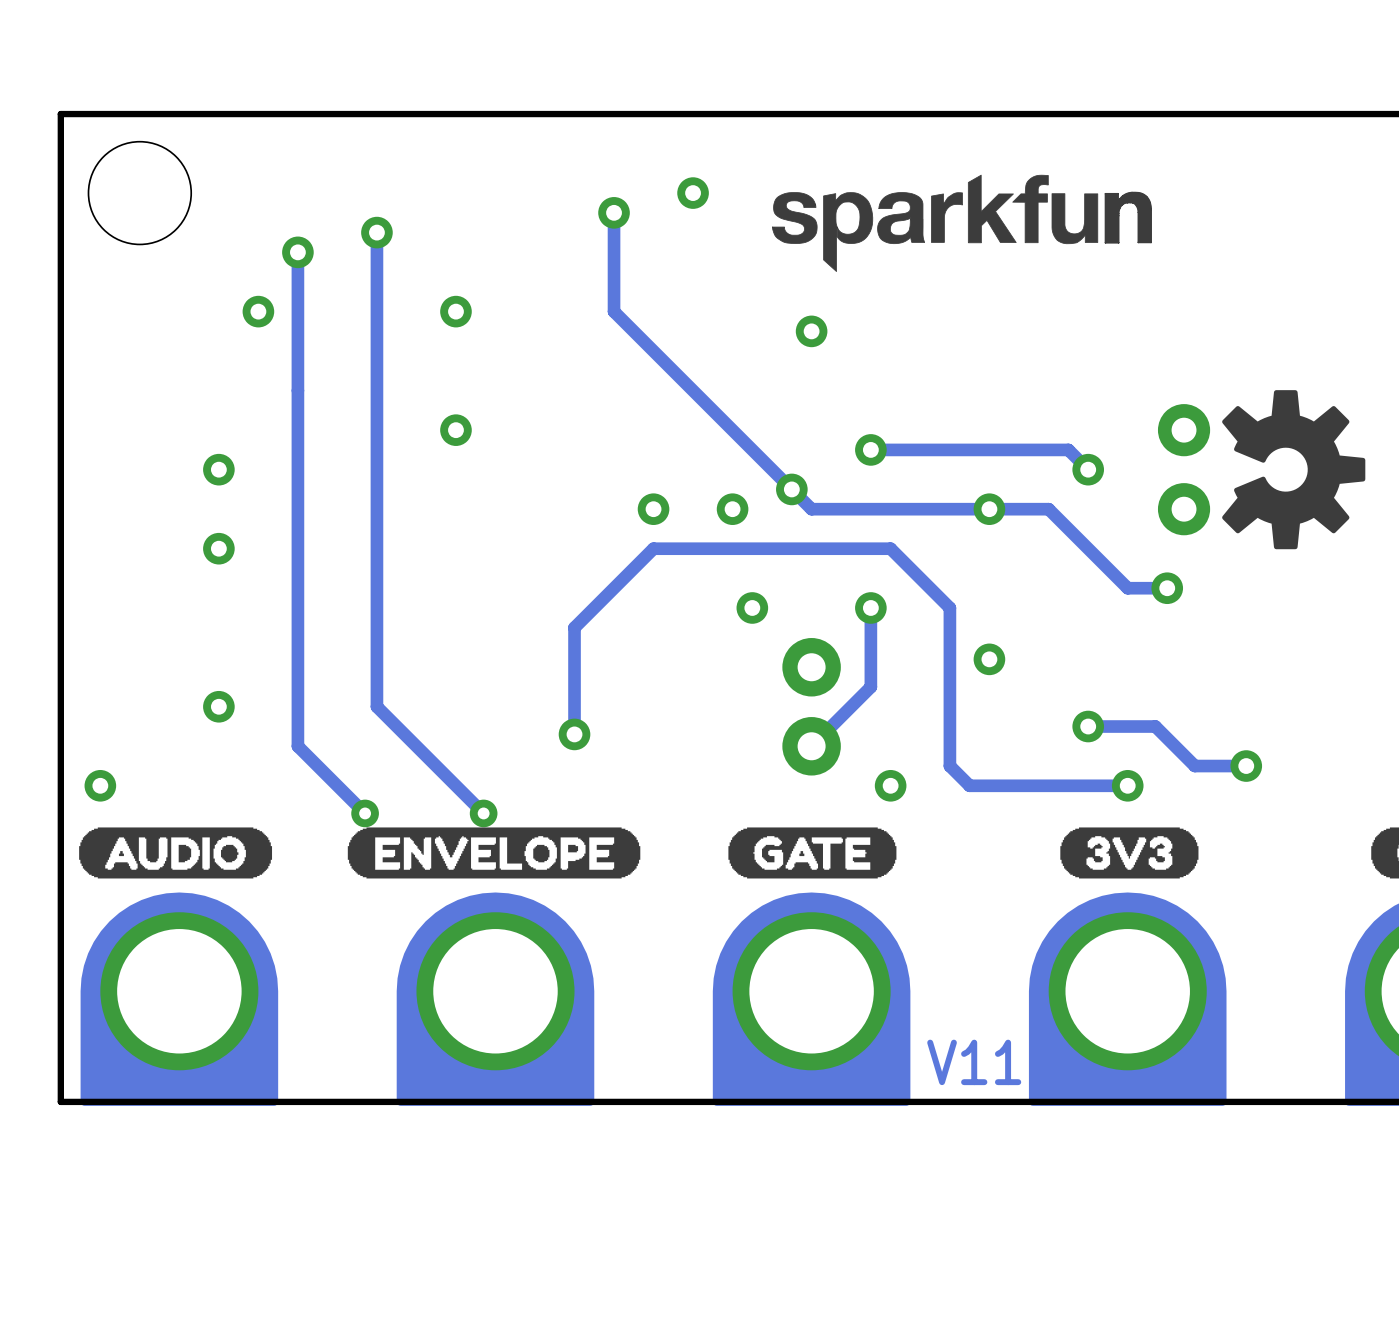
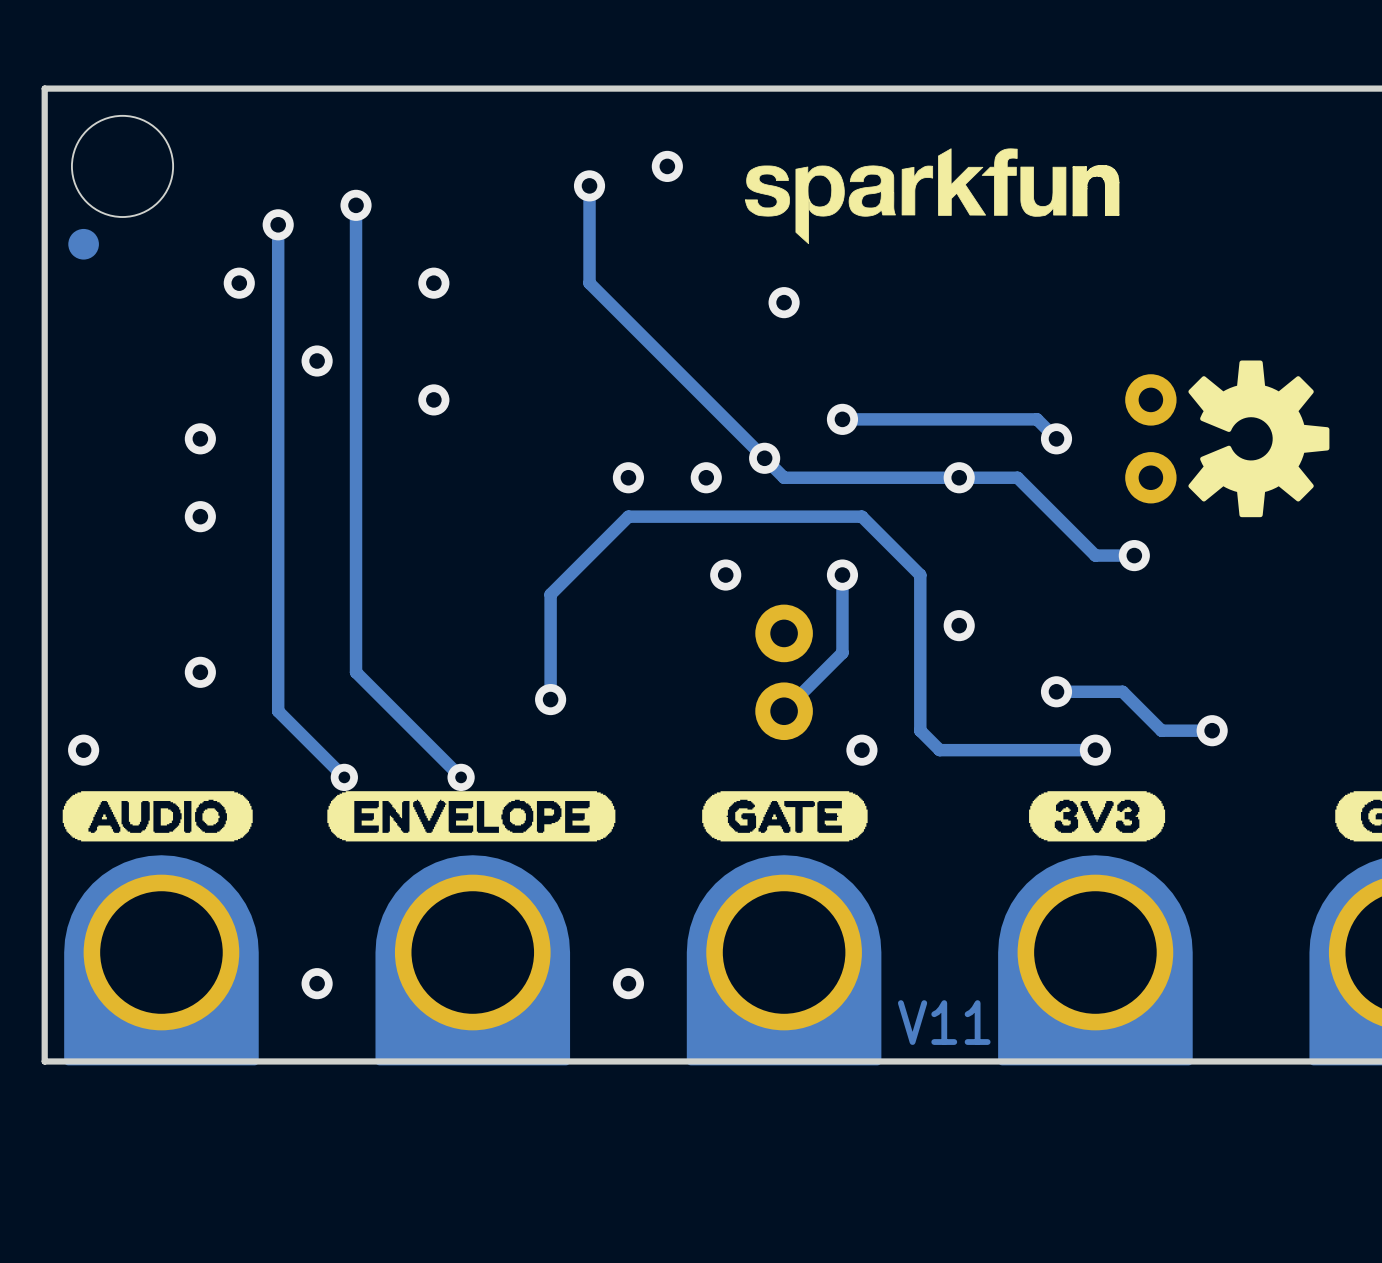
part: none -> (83, 244)
via: none -> (317, 361)
via: none -> (317, 983)
via: none -> (628, 983)

